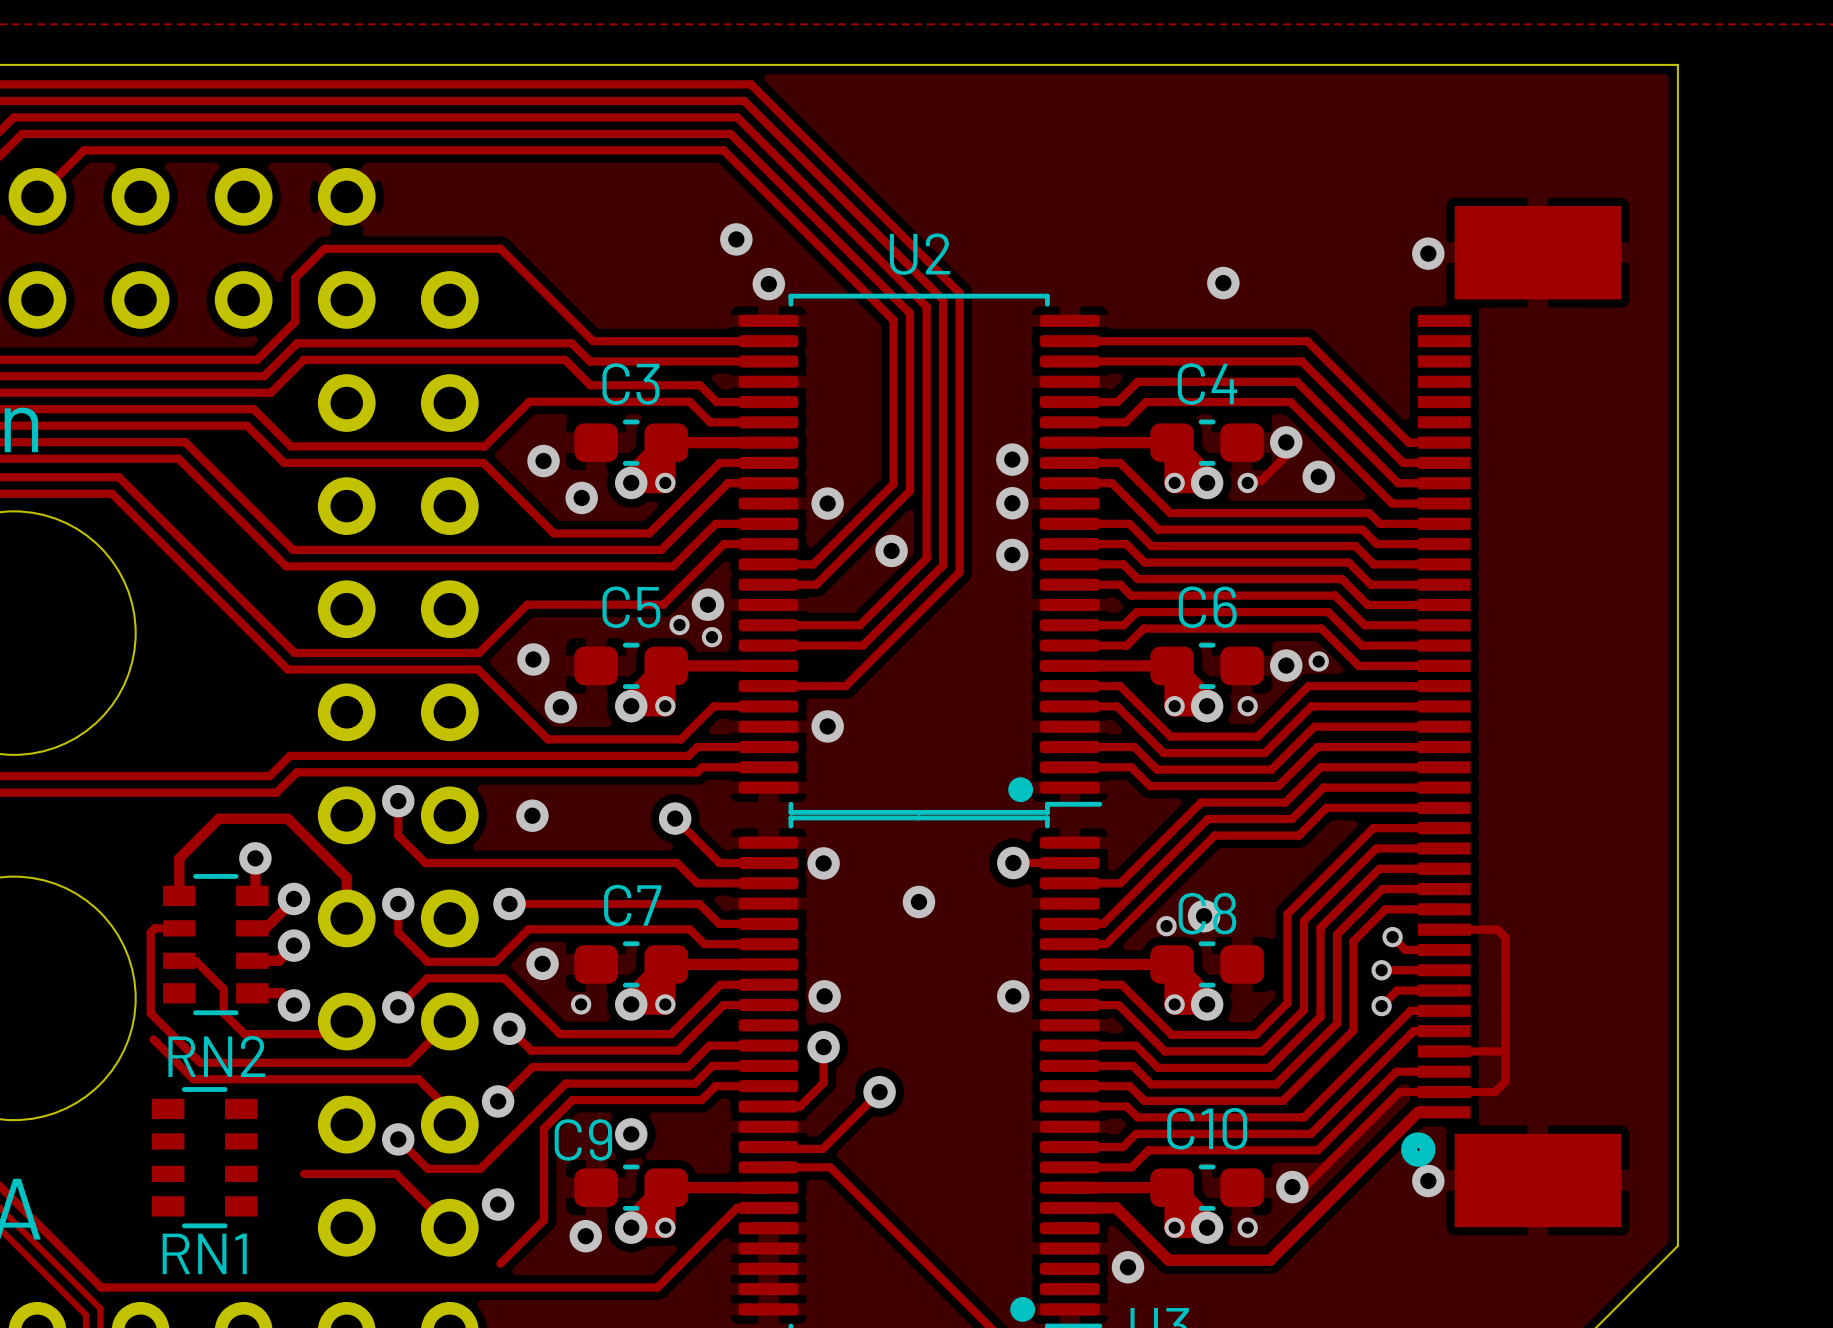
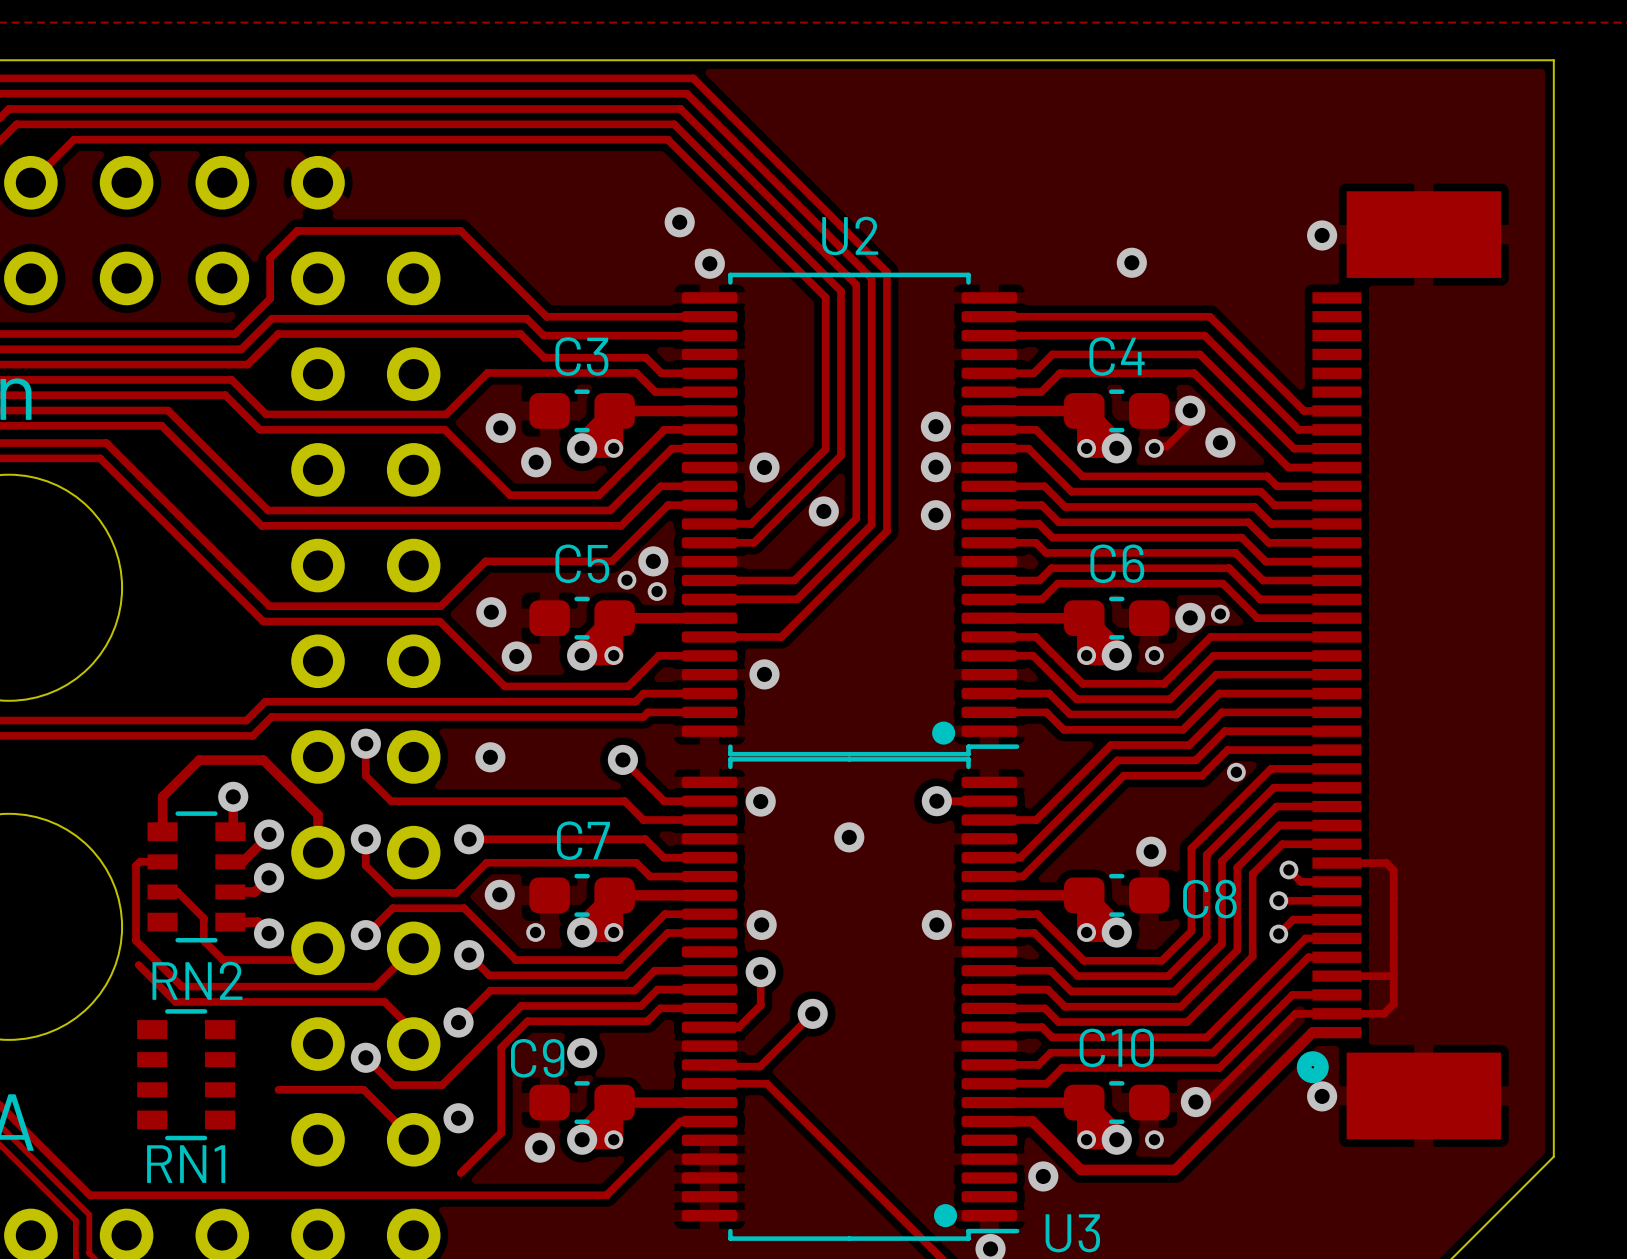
C8 name position: C8 (1207, 913) -> C8 (1209, 899)
via position: (1204, 916) -> (1151, 851)
via position: (1166, 926) -> (1236, 772)

